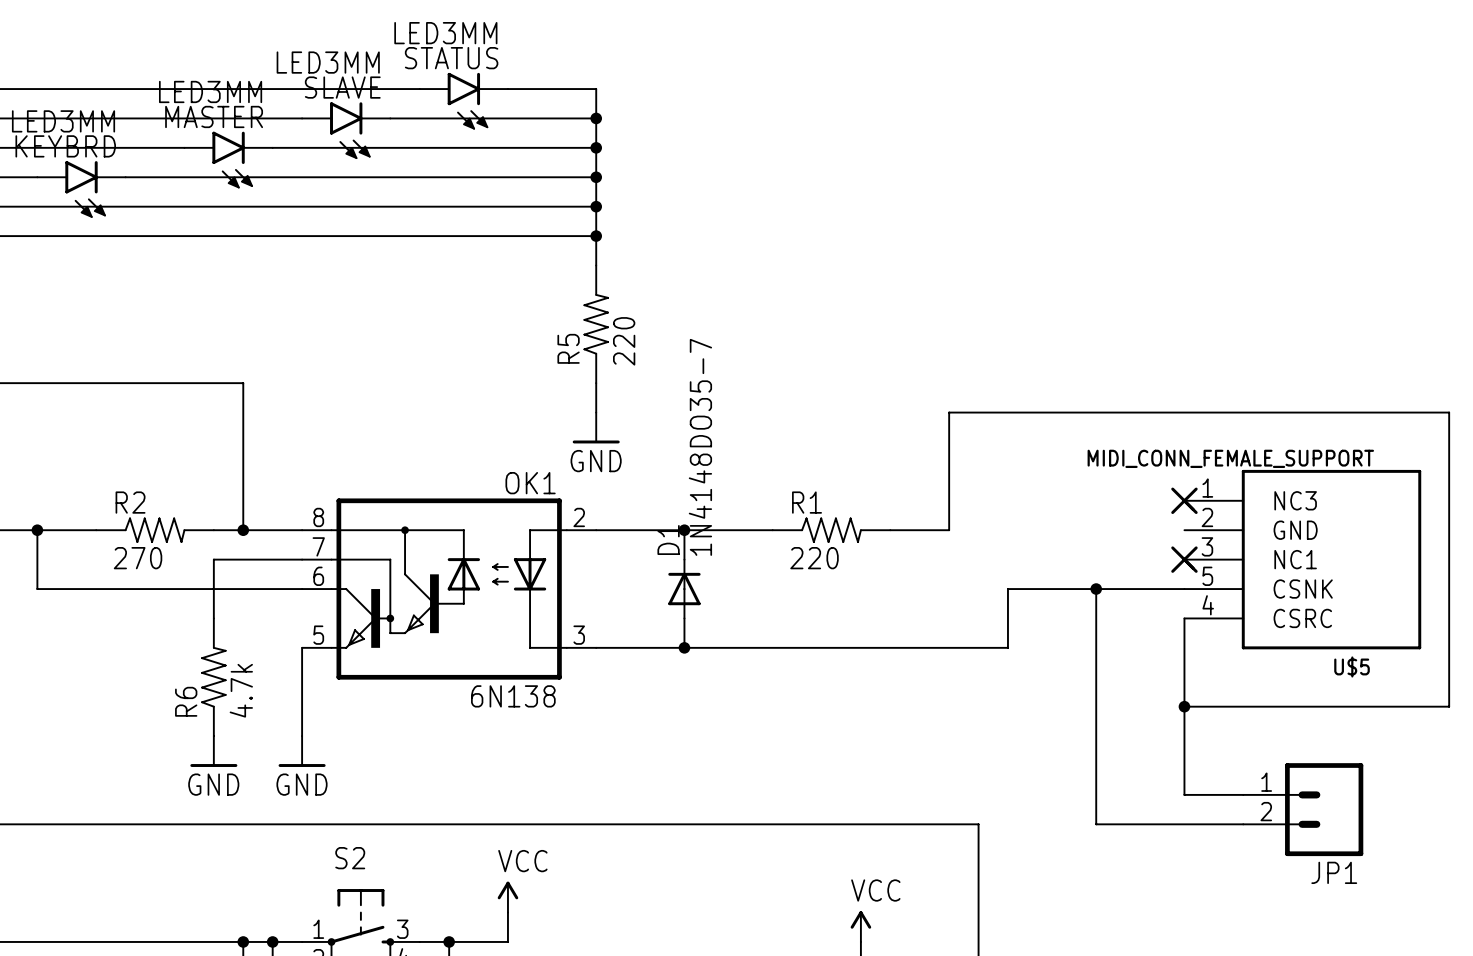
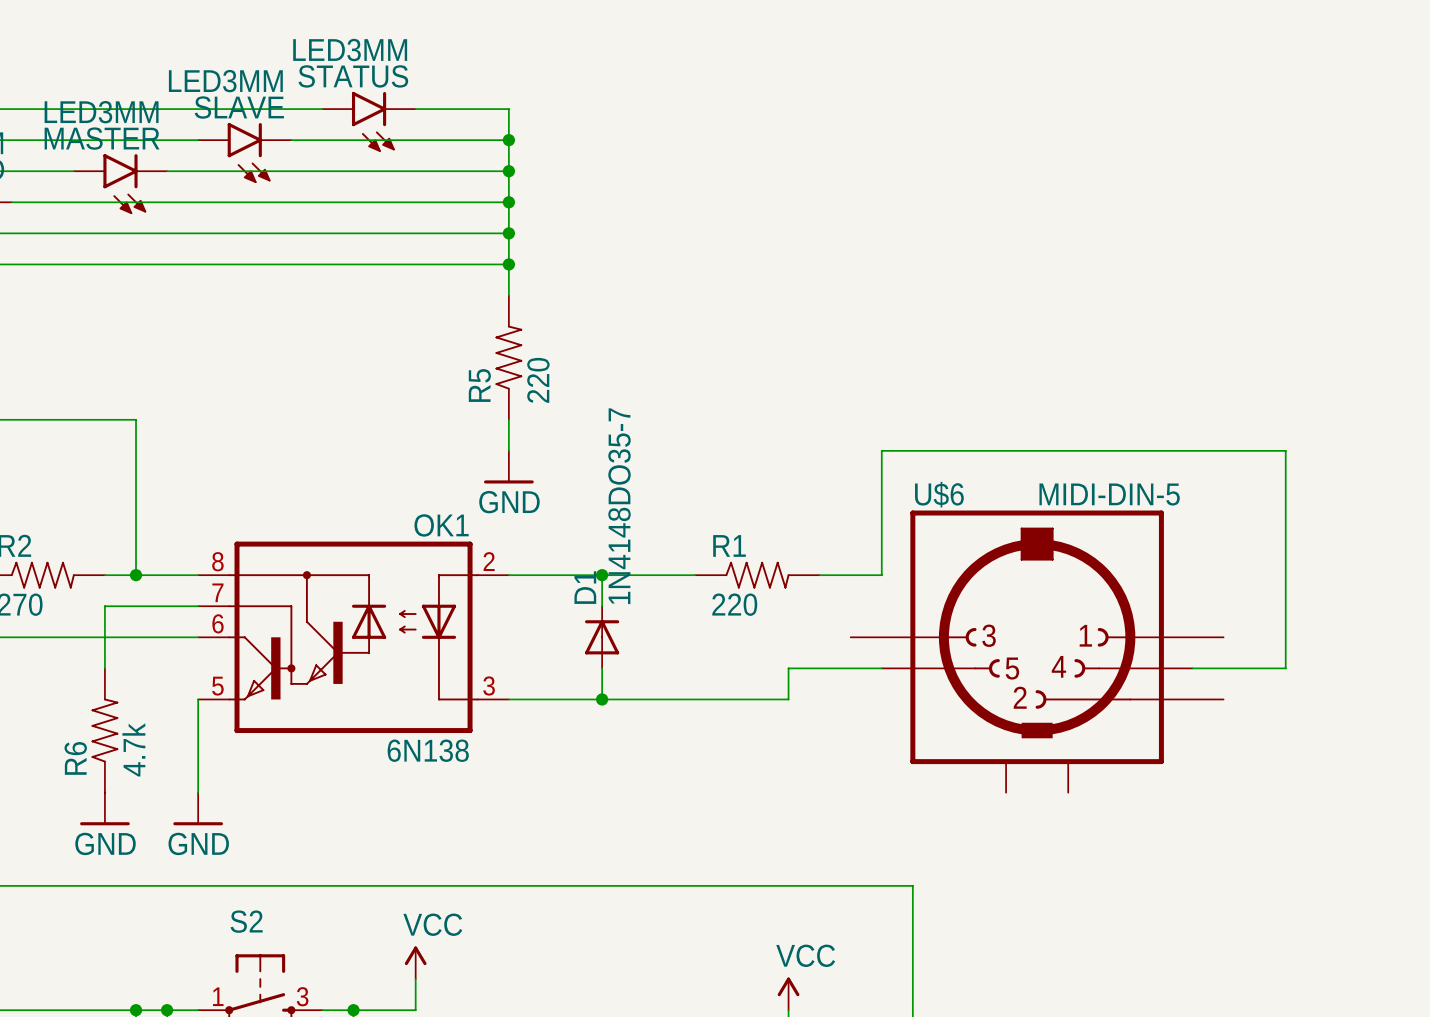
wire: (1331, 412) (1449, 412) (1449, 706) (1184, 706) -> (1285, 450) (1285, 668) (1192, 668)
U$5: MIDI_CONN_FEMALE_SUPPORT (1296, 559) -> none
wire: (1096, 589) (1096, 824) (1243, 824) -> none
junction: (1096, 589) -> none
wire: (1184, 589) (1007, 589) (1007, 647) (860, 647) -> (881, 668) (788, 668) (788, 699)
U$6: none -> MIDI-DIN-5 (1037, 651)
wire: (1184, 618) (1184, 794) (1243, 794) -> none
junction: (1184, 706) -> none
JP1: (1303, 809) -> none

